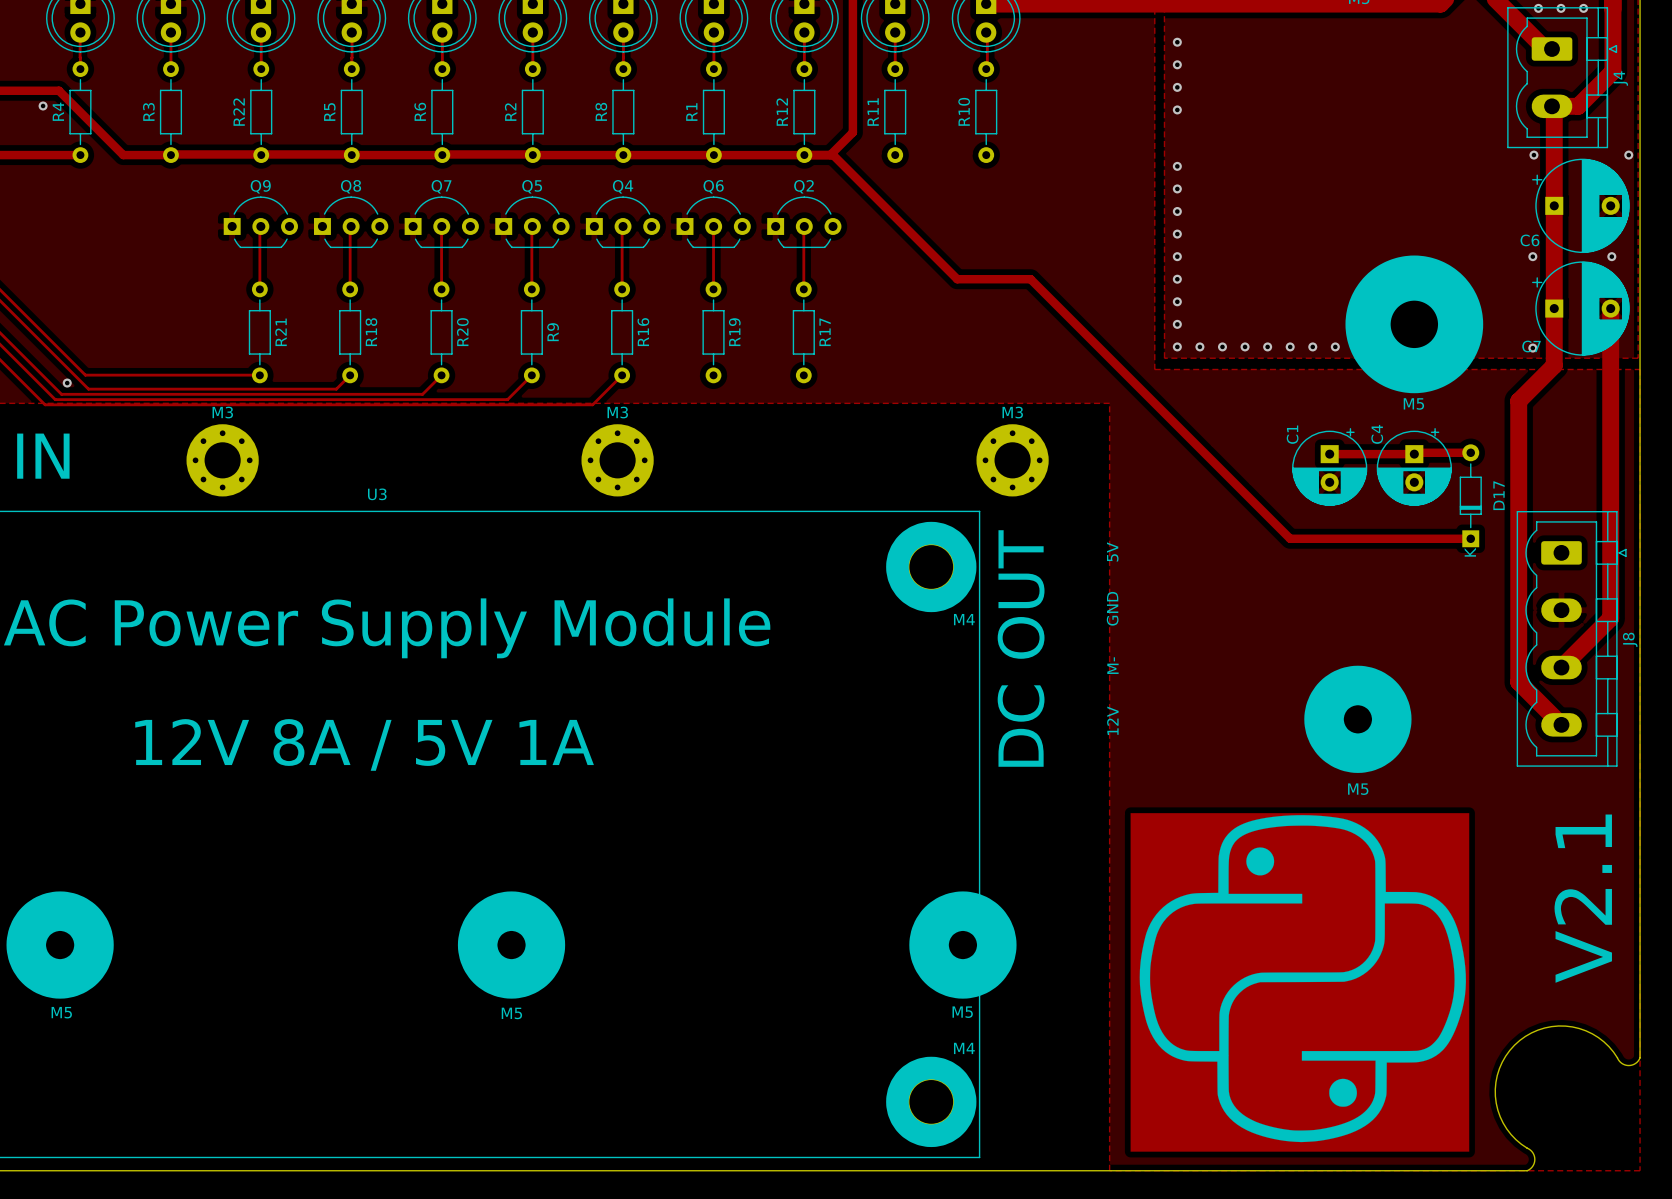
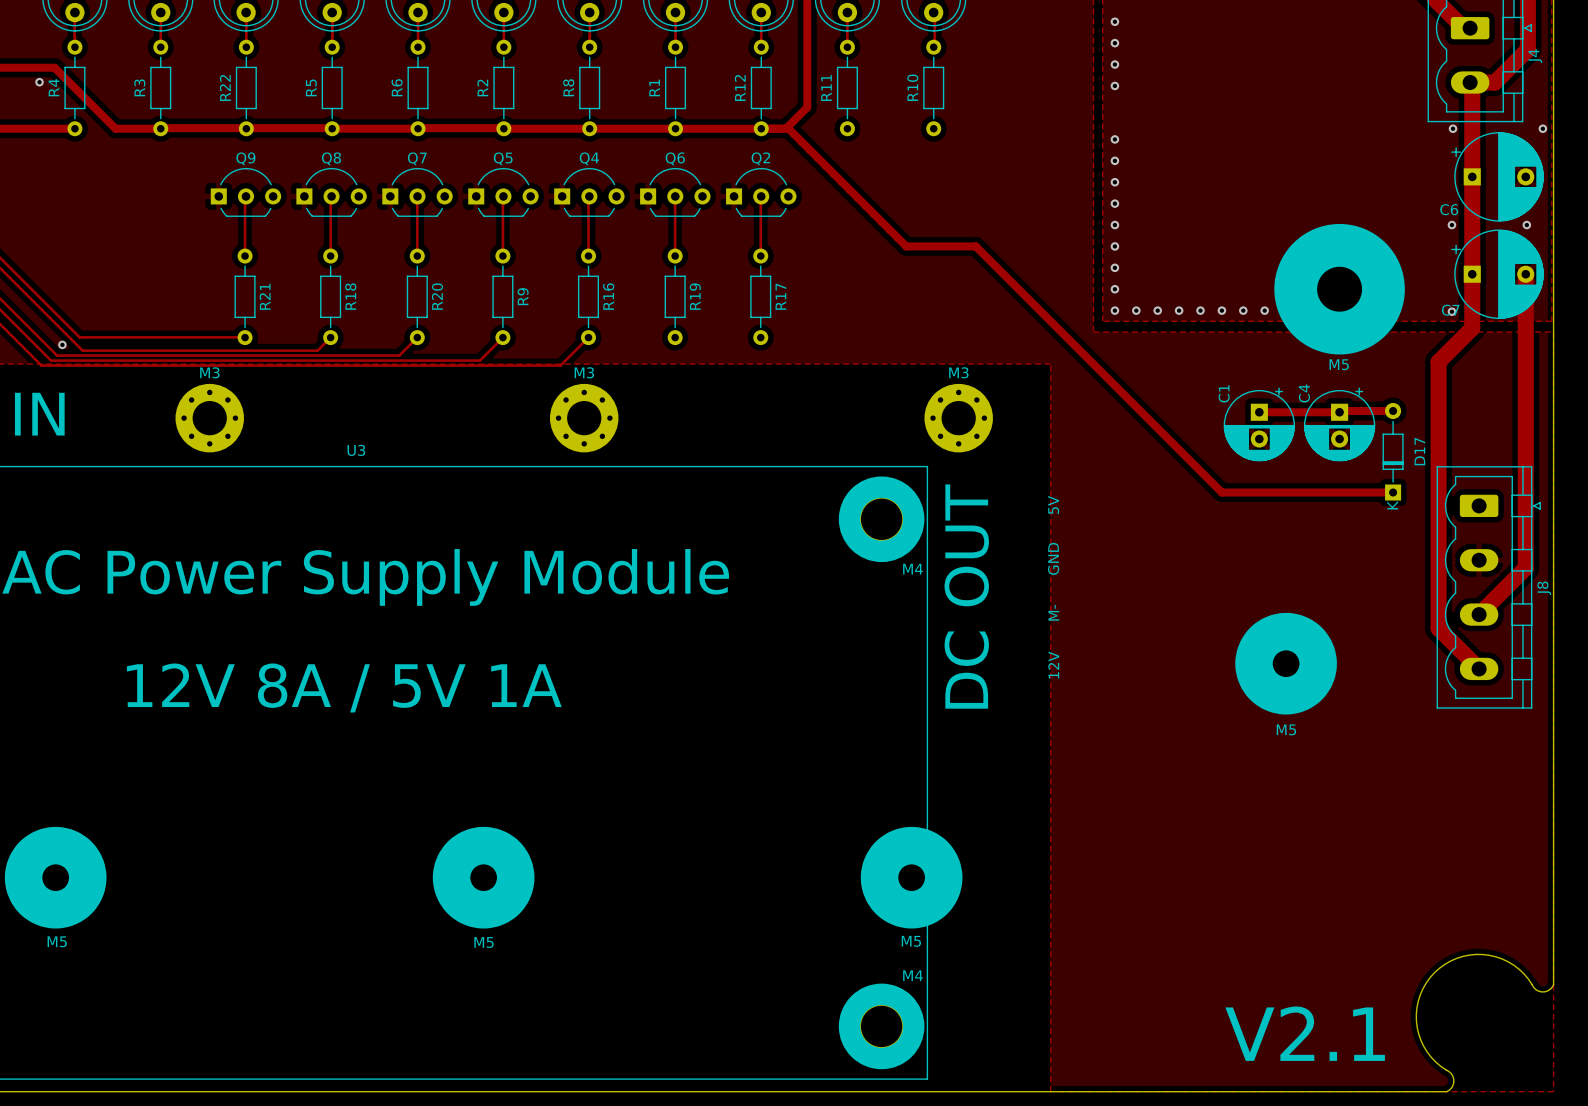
drawing: [1130, 813, 1470, 1152] -> none
text: V2.1 (1583, 898) -> none
text: none -> V2.1 (1305, 1033)

